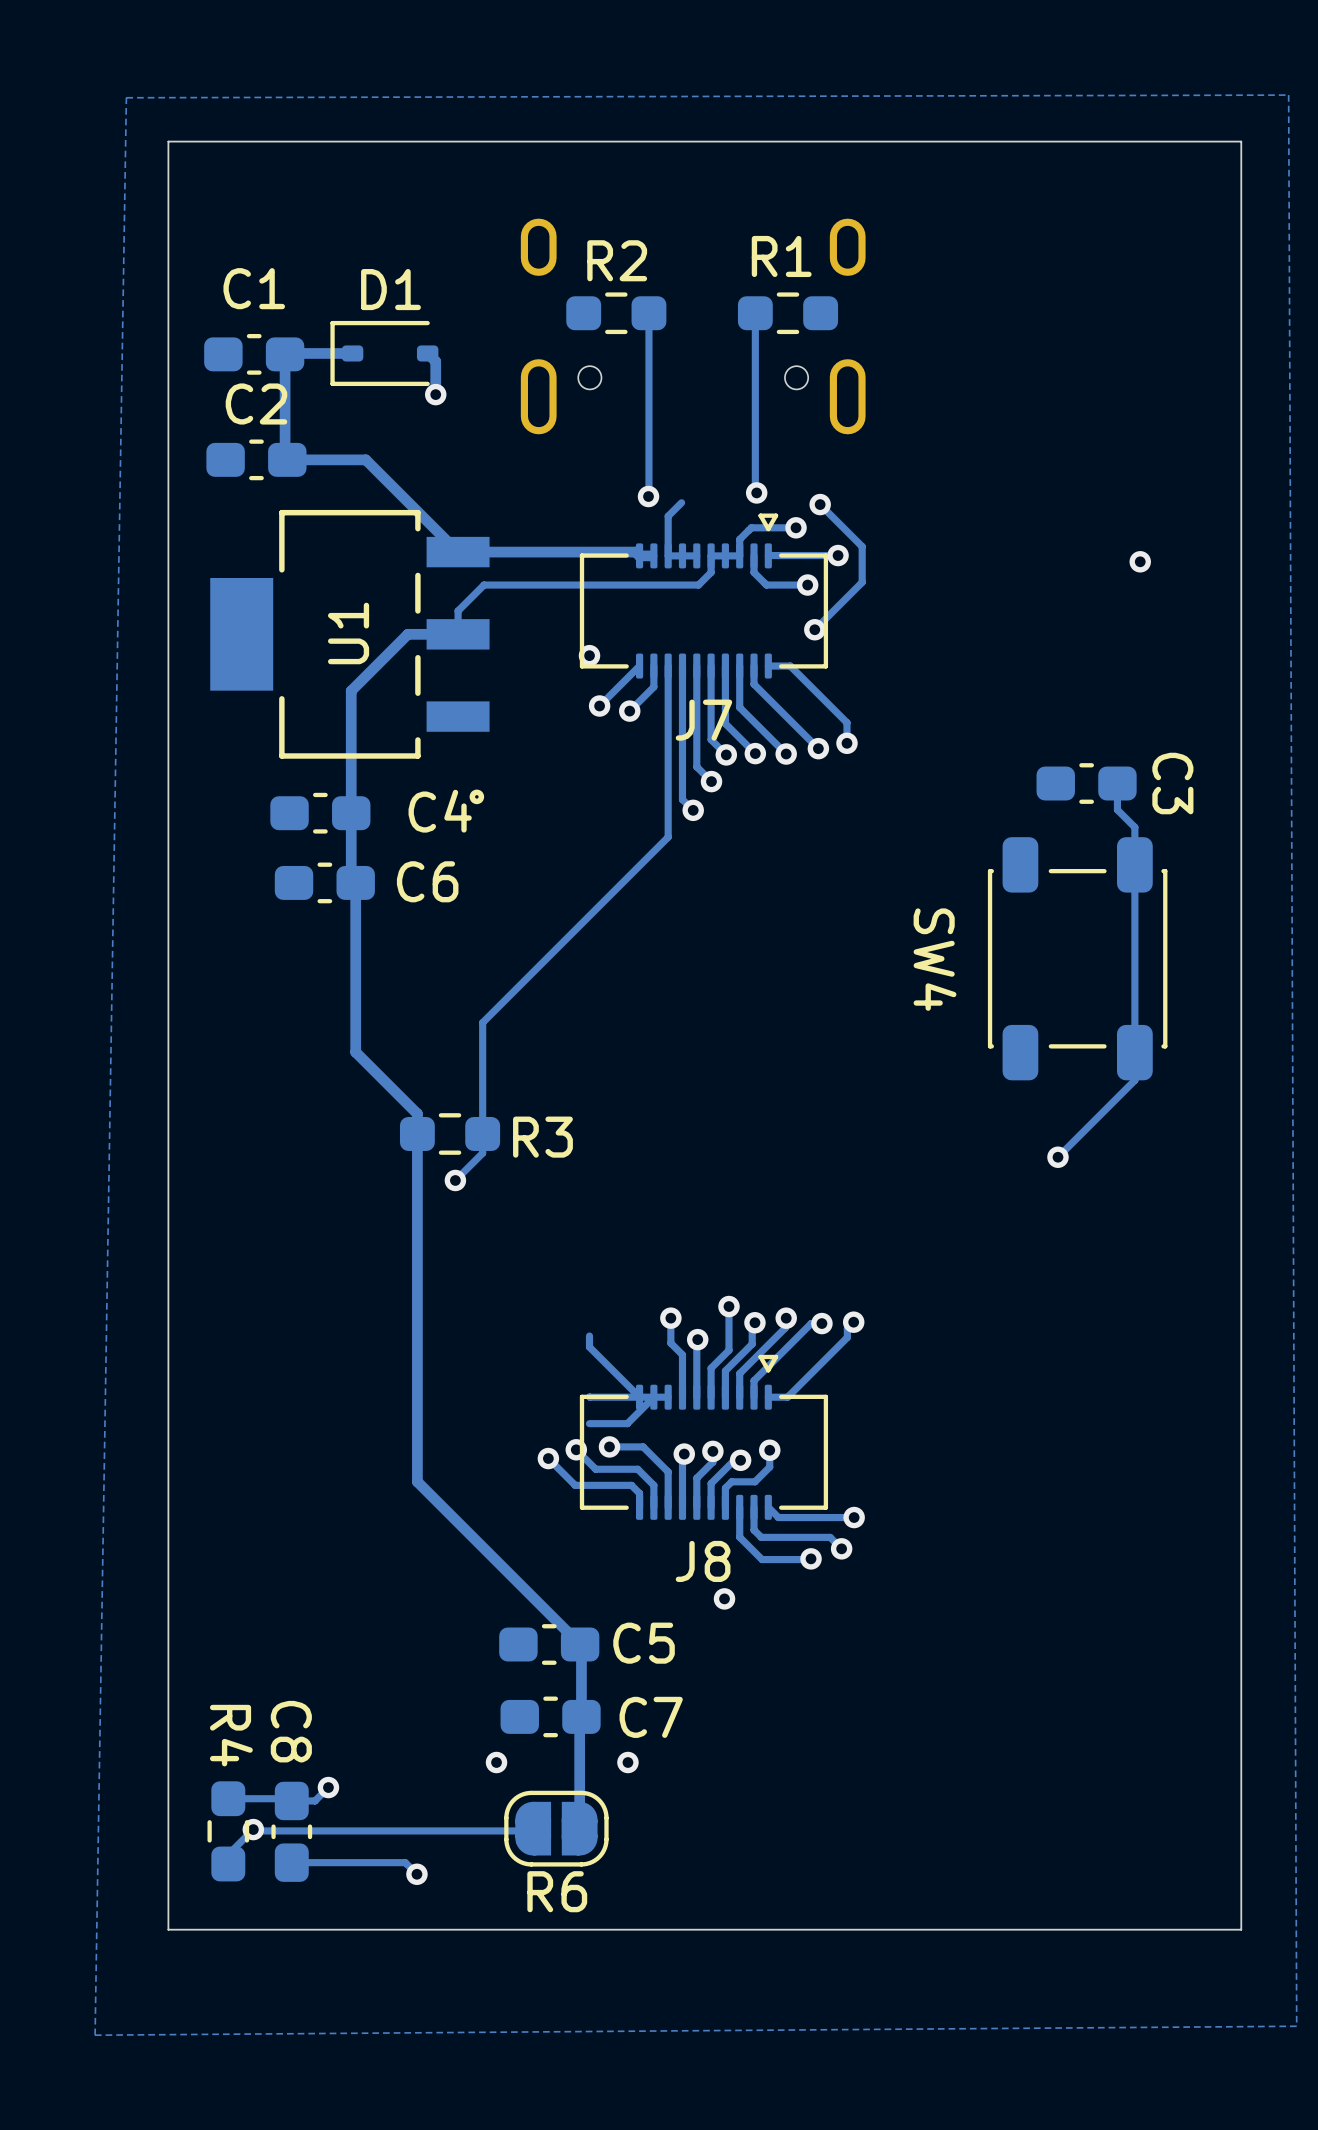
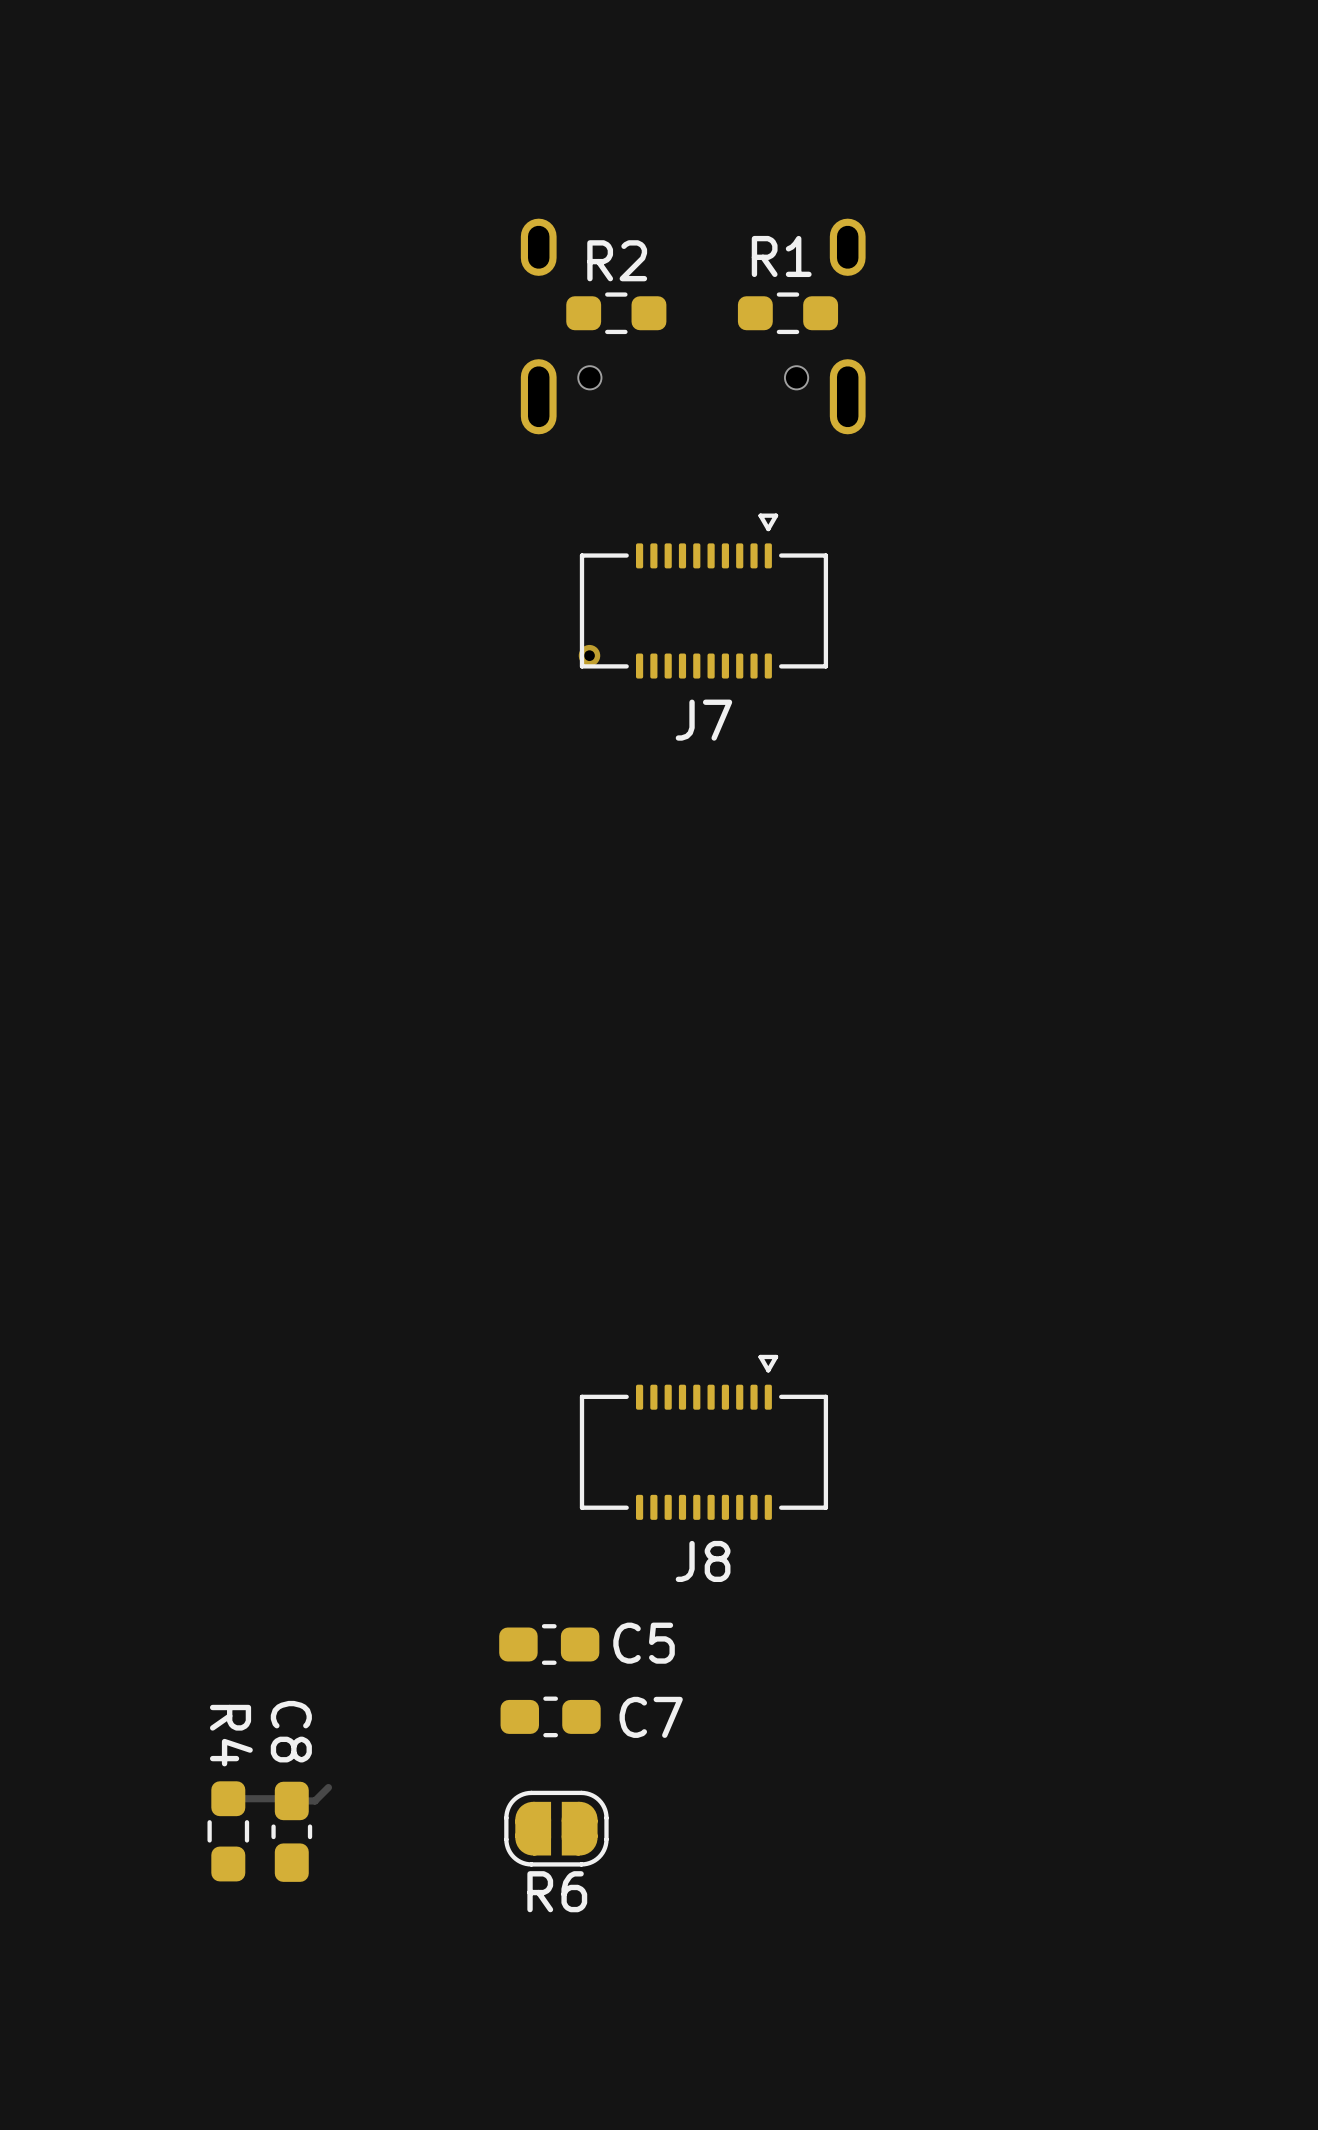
zone outline: (1288, 95) (1296, 2026) (95, 2035) (126, 97) (1288, 95) -> none
board edge: (1241, 141) (168, 141) (168, 1929) (1241, 1929) (1241, 141) -> none
track: (648, 313) (648, 496) -> none
track: (755, 313) (756, 492) -> none
track: (352, 353) (285, 354) (285, 457) (287, 459) (365, 459) (458, 552) (635, 552) (639, 555) (652, 555) -> none
D1: (384, 353) -> none
track: (427, 353) (435, 361) (435, 394) -> none
C1: (254, 354) -> none
via: (435, 394) -> none
C2: (256, 459) -> none
via: (756, 492) -> none
via: (648, 496) -> none
track: (681, 502) (668, 516) (668, 555) (696, 555) -> none
track: (820, 504) (862, 546) (862, 582) (814, 629) -> none
via: (820, 504) -> none
track: (796, 527) (751, 527) (739, 539) (739, 555) (711, 555) (711, 572) (698, 585) (484, 585) (458, 610) (458, 634) (407, 634) (351, 690) (351, 878) (355, 882) (355, 1052) (417, 1113) (417, 1481) (581, 1645) (579, 1828) -> none
via: (796, 527) -> none
track: (754, 555) (754, 572) (766, 585) (807, 585) -> none
track: (838, 555) (768, 555) -> none
via: (838, 555) -> none
via: (1140, 561) -> none
via: (807, 585) -> none
via: (814, 629) -> none
U1: (349, 657) -> none
track: (639, 666) (599, 706) -> none
track: (653, 666) (653, 686) (629, 711) -> none
track: (668, 666) (668, 837) (482, 1022) (482, 1153) (455, 1180) -> none
track: (682, 666) (682, 799) (693, 810) -> none
track: (696, 666) (696, 766) (711, 781) -> none
track: (711, 666) (711, 739) (726, 754) -> none
track: (725, 666) (725, 723) (755, 753) -> none
track: (739, 666) (739, 707) (786, 754) -> none
track: (754, 666) (754, 684) (818, 748) -> none
track: (768, 666) (790, 666) (846, 722) (846, 743) -> none
via: (599, 706) -> none
via: (629, 711) -> none
via: (846, 743) -> none
via: (818, 748) -> none
via: (755, 753) -> none
via: (726, 754) -> none
via: (786, 754) -> none
via: (711, 781) -> none
C3: (1086, 783) -> none
track: (1117, 783) (1117, 809) (1134, 827) (1134, 1080) (1057, 1157) -> none
via: (693, 810) -> none
C4: (320, 813) -> none
C6: (324, 882) -> none
SW4: (1077, 958) -> none
R3: (450, 1133) -> none
via: (1057, 1157) -> none
via: (455, 1180) -> none
track: (728, 1306) (728, 1350) (711, 1368) (711, 1397) -> none
via: (728, 1306) -> none
track: (670, 1318) (670, 1343) (682, 1354) (682, 1397) -> none
via: (670, 1318) -> none
track: (786, 1318) (785, 1328) (739, 1373) (739, 1397) -> none
via: (786, 1318) -> none
track: (754, 1322) (752, 1322) (752, 1344) (725, 1370) (725, 1397) -> none
via: (754, 1322) -> none
track: (853, 1322) (847, 1328) (847, 1337) (787, 1397) (768, 1397) -> none
via: (853, 1322) -> none
track: (821, 1323) (811, 1323) (754, 1380) (754, 1397) -> none
via: (821, 1323) -> none
track: (589, 1336) (589, 1347) (639, 1397) -> none
track: (697, 1339) (696, 1397) -> none
via: (697, 1339) -> none
track: (653, 1397) (627, 1423) (589, 1423) -> none
track: (668, 1397) (589, 1397) -> none
track: (609, 1446) (643, 1446) (668, 1471) (668, 1507) -> none
via: (609, 1446) -> none
track: (576, 1449) (595, 1469) (637, 1469) (653, 1485) (653, 1507) -> none
via: (576, 1449) -> none
track: (769, 1450) (769, 1467) (754, 1481) (731, 1481) (725, 1488) (725, 1507) -> none
via: (769, 1450) -> none
track: (712, 1451) (712, 1462) (696, 1478) (696, 1507) -> none
via: (712, 1451) -> none
track: (684, 1454) (682, 1455) (682, 1507) -> none
via: (684, 1454) -> none
track: (548, 1458) (575, 1485) (631, 1485) (639, 1493) (639, 1507) -> none
via: (548, 1458) -> none
track: (740, 1460) (734, 1460) (711, 1483) (711, 1507) -> none
via: (740, 1460) -> none
track: (739, 1507) (739, 1537) (762, 1559) (811, 1558) -> none
track: (754, 1507) (754, 1530) (761, 1537) (830, 1537) (841, 1548) -> none
track: (768, 1507) (778, 1517) (854, 1517) -> none
via: (854, 1517) -> none
via: (841, 1548) -> none
via: (811, 1558) -> none
via: (724, 1598) -> none
via: (496, 1762) -> none
via: (627, 1762) -> none
via: (328, 1787) -> none
via: (253, 1829) -> none
track: (530, 1830) (253, 1829) (228, 1854) (228, 1863) -> none
track: (291, 1862) (405, 1862) (416, 1874) -> none
via: (416, 1874) -> none

